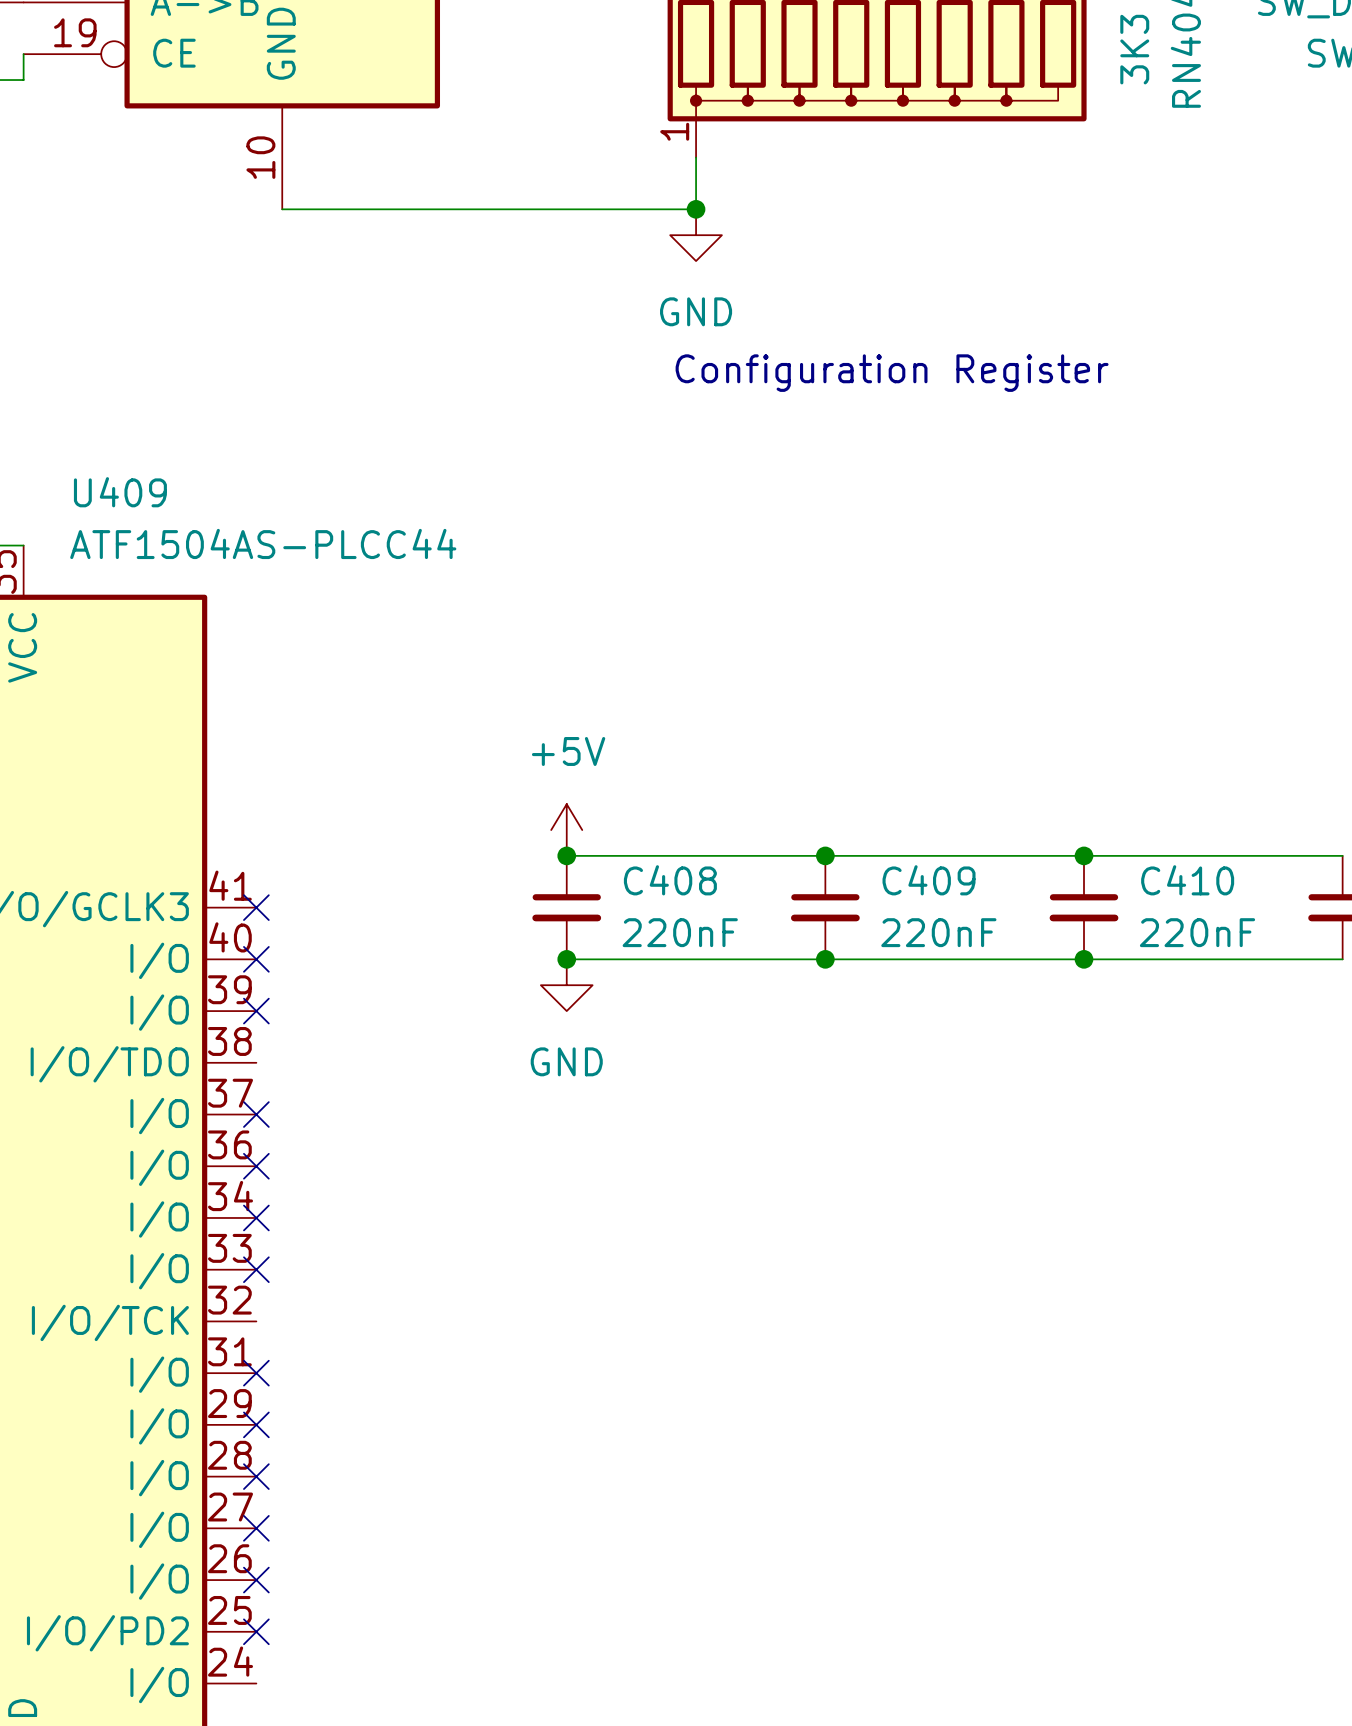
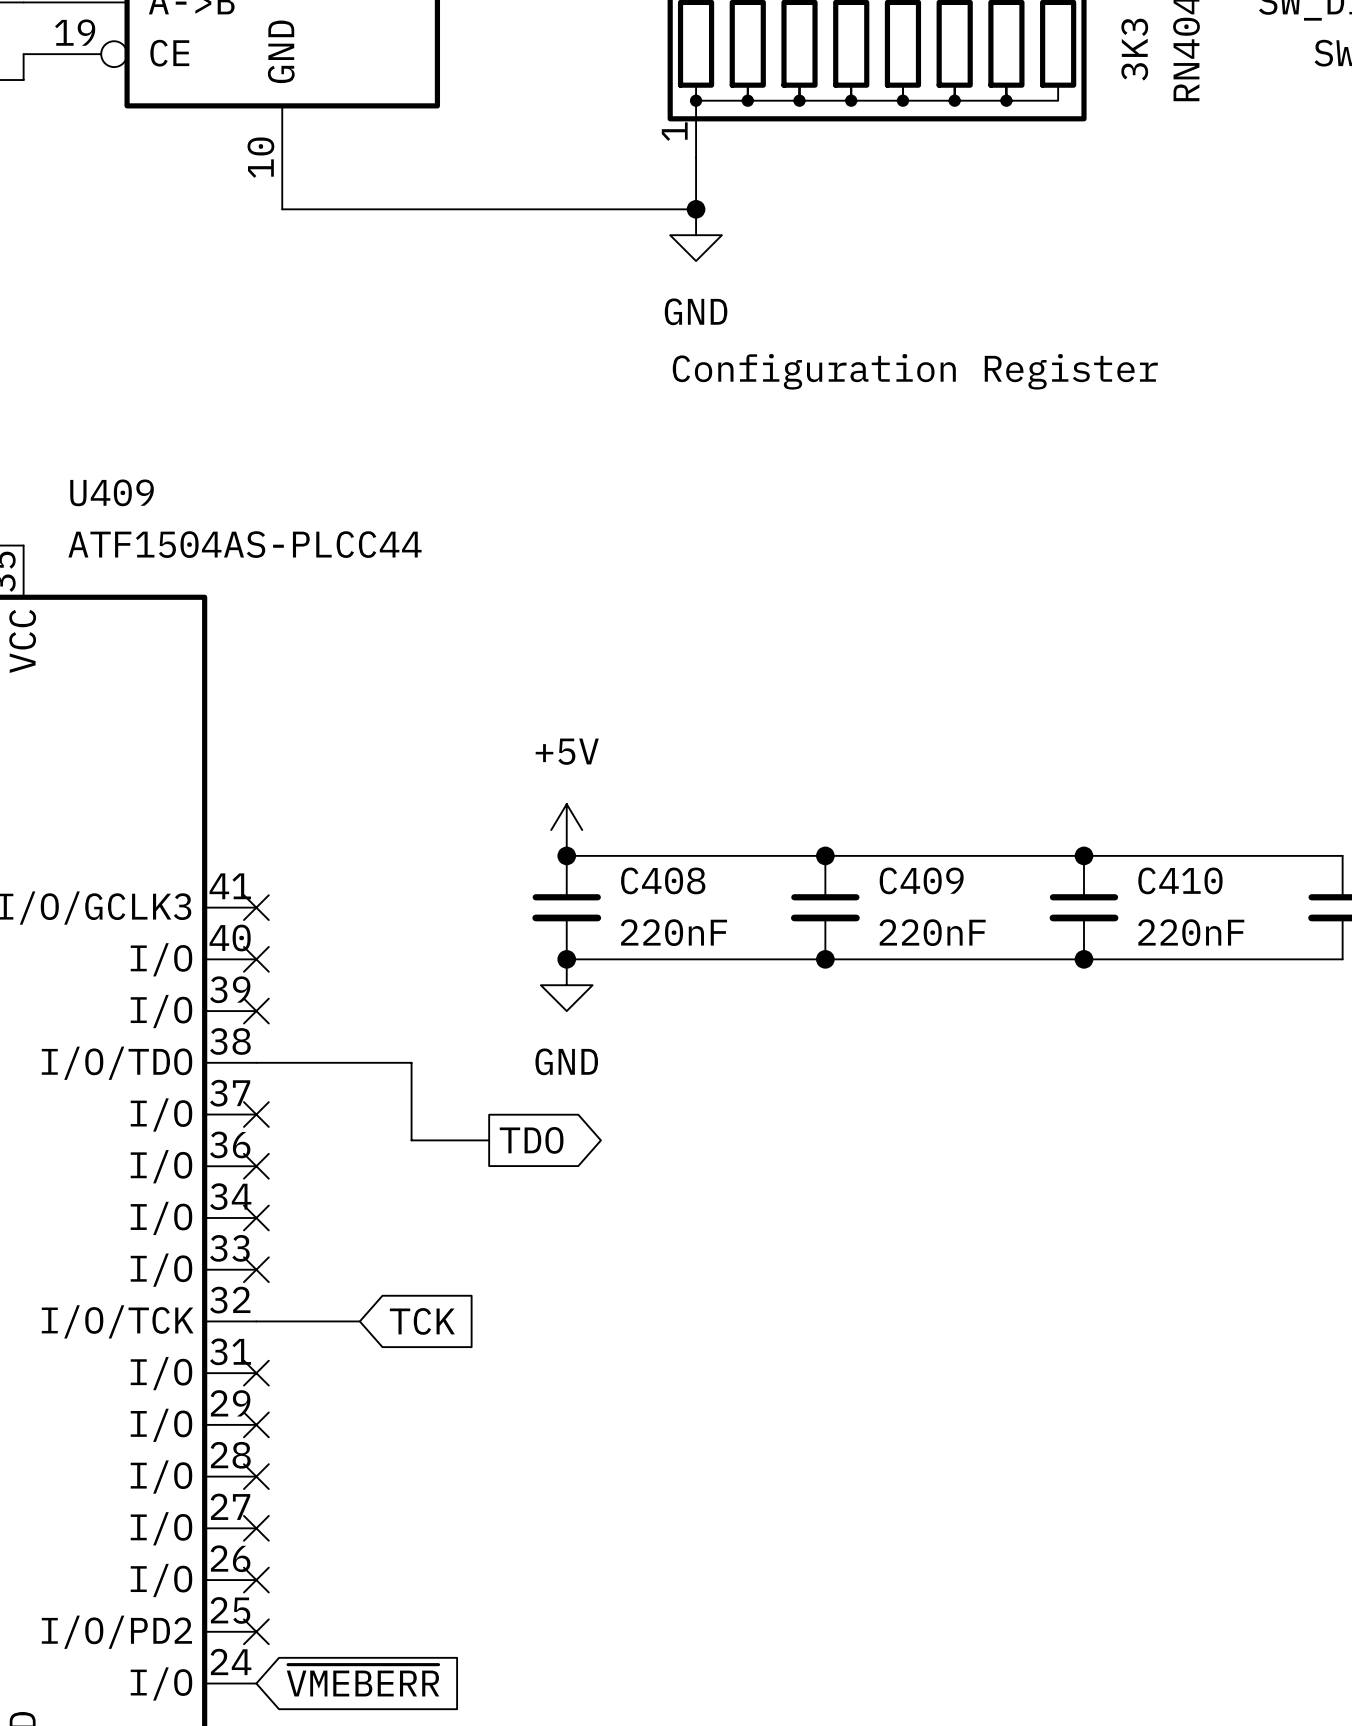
wire: none -> (256, 1062) (411, 1062) (411, 1140) (489, 1140)
global label: none -> TDO (531, 1140)
wire: none -> (256, 1321) (359, 1321)
global label: none -> TCK (422, 1321)
global label: none -> ~{VMEBERR} (363, 1680)

